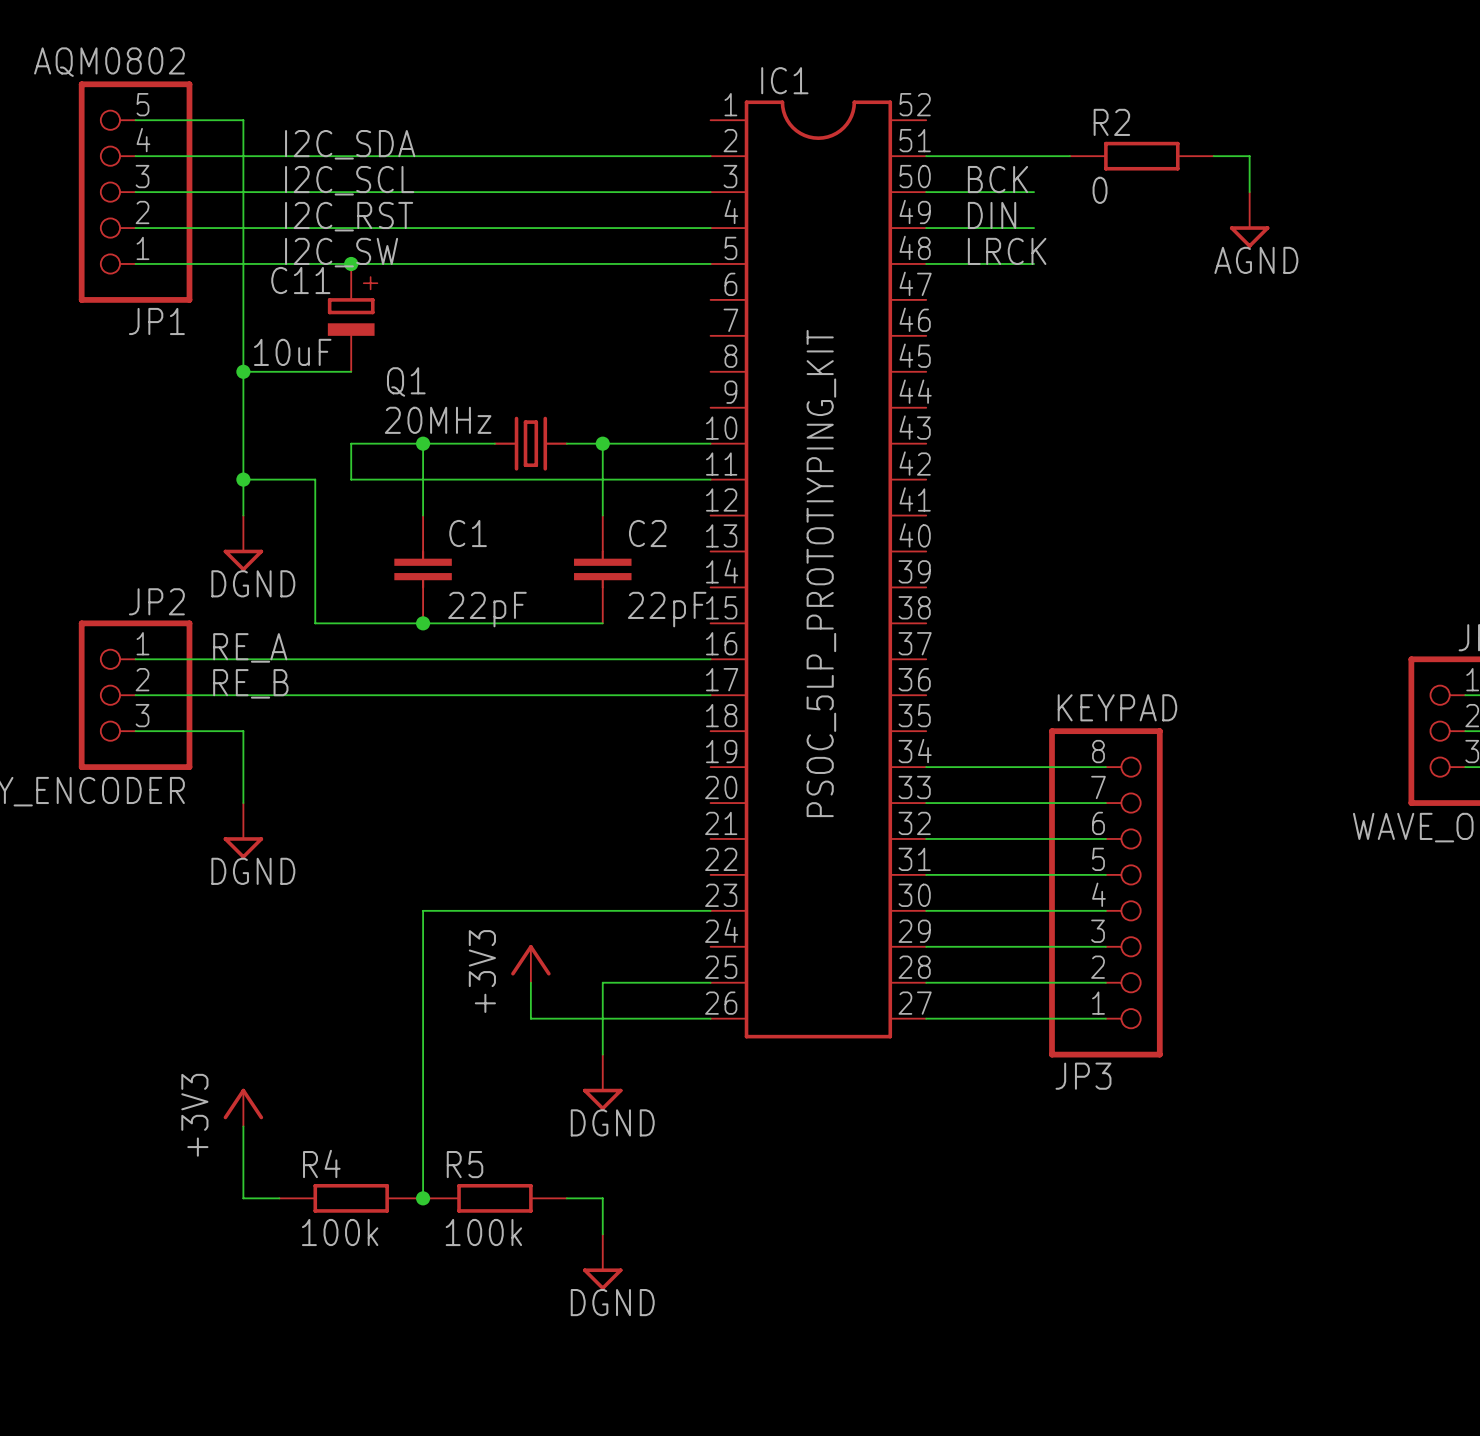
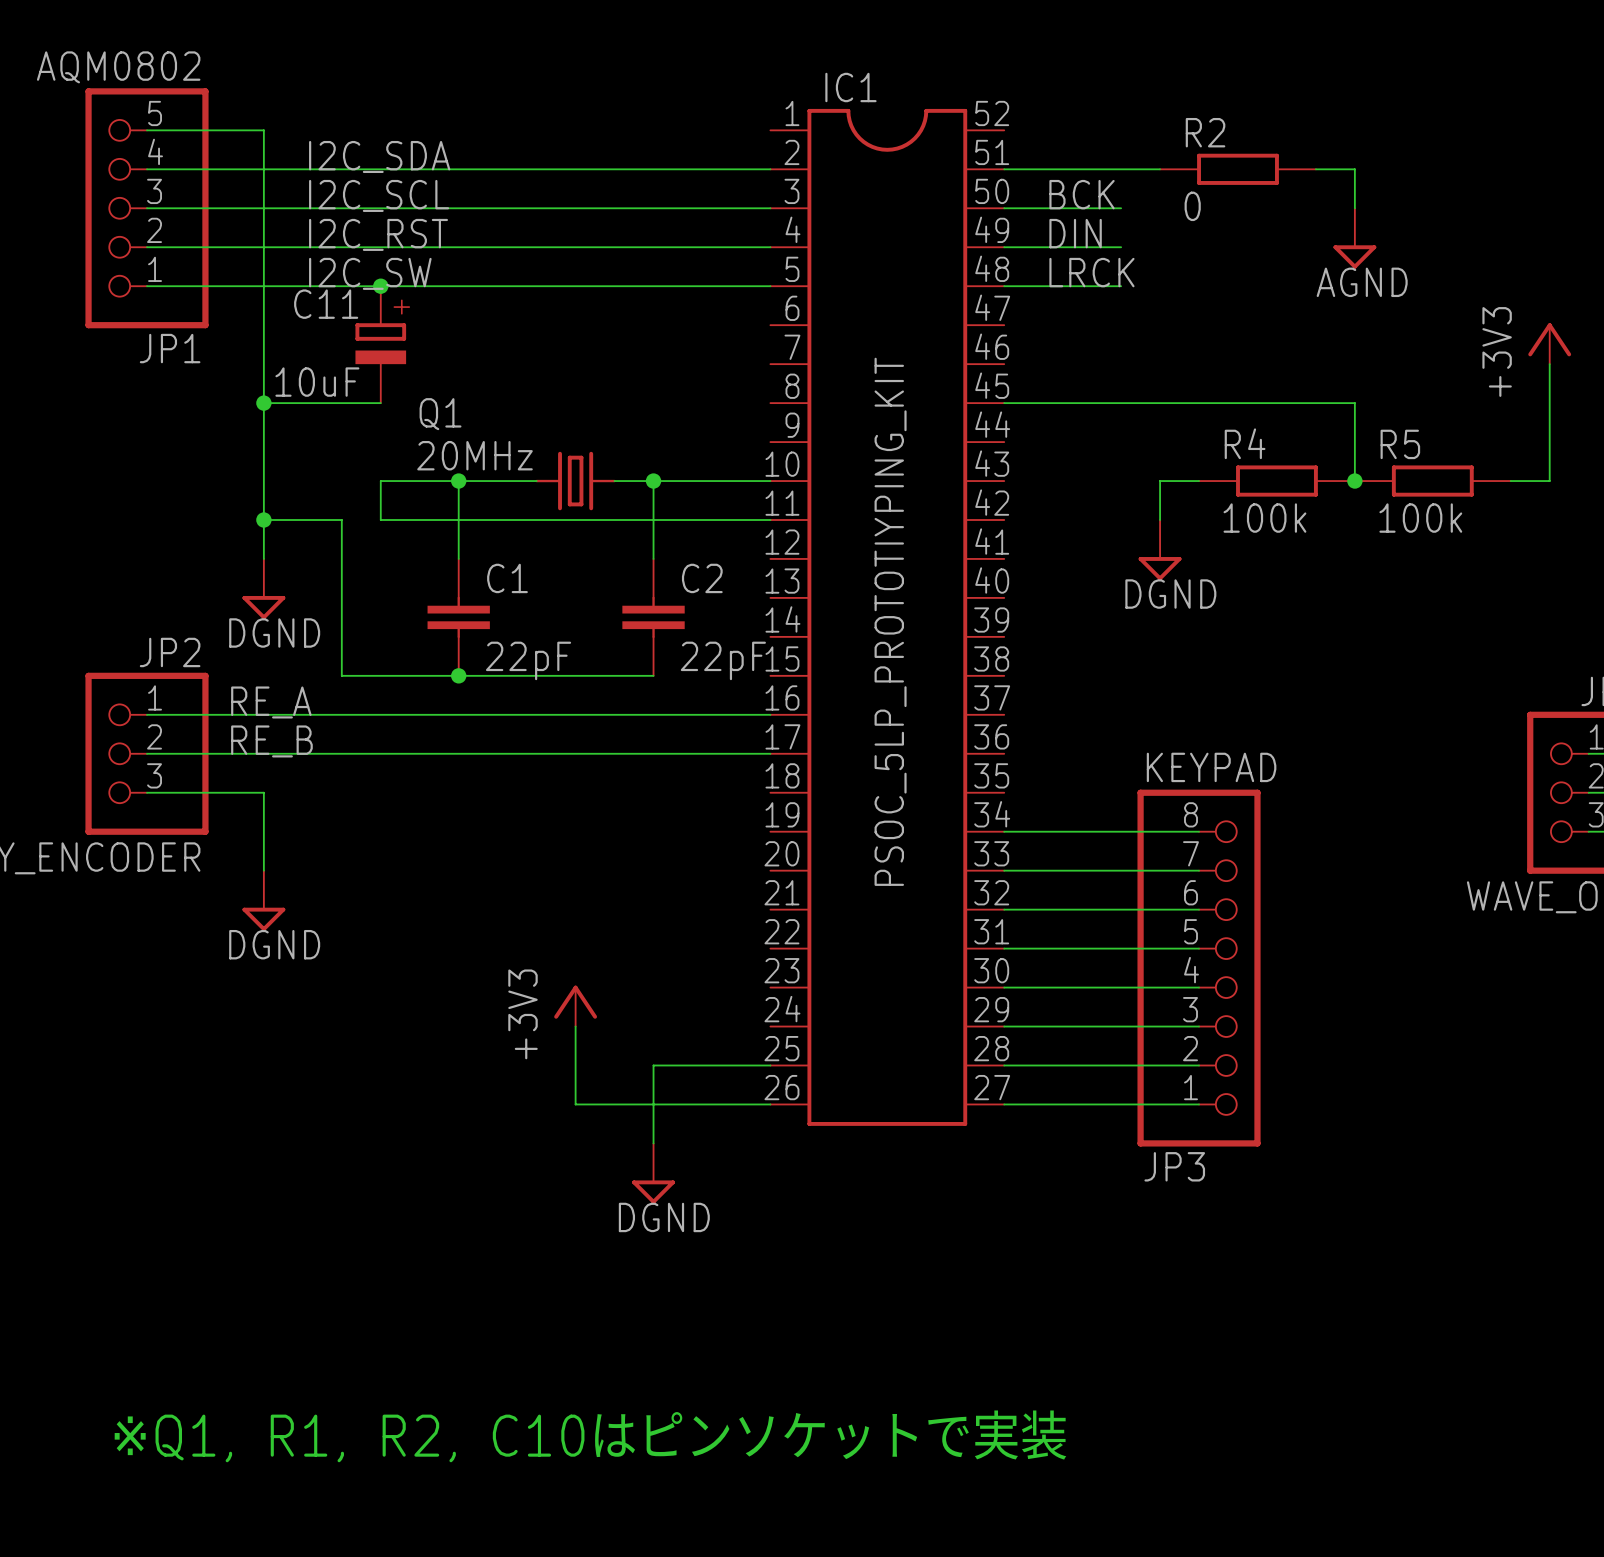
power symbol: none -> +3V3 (1549, 343)
wire: none -> (1549, 364) (1549, 481) (1510, 481)
wire: none -> (1004, 403) (1354, 403) (1354, 481)
wire: none -> (1199, 481) (1160, 481) (1160, 519)
junction: none -> (1354, 481)
power symbol: none -> DGND (1160, 550)
wire: (710, 910) (423, 910) (423, 1198) -> none
power symbol position: +3V3 (530, 963) -> +3V3 (575, 1006)
power symbol: +3V3 (243, 1107) -> none
wire: (243, 1126) (243, 1198) (279, 1198) -> none
R4 position: (351, 1198) -> (1276, 481)
junction: (423, 1198) -> none
R5 position: (494, 1198) -> (1432, 481)
wire: (566, 1198) (602, 1198) (602, 1234) -> none
power symbol: DGND (602, 1262) -> none
text: none -> ※Q1, R1, R2, C10はピンソケットで実装 (590, 1435)

